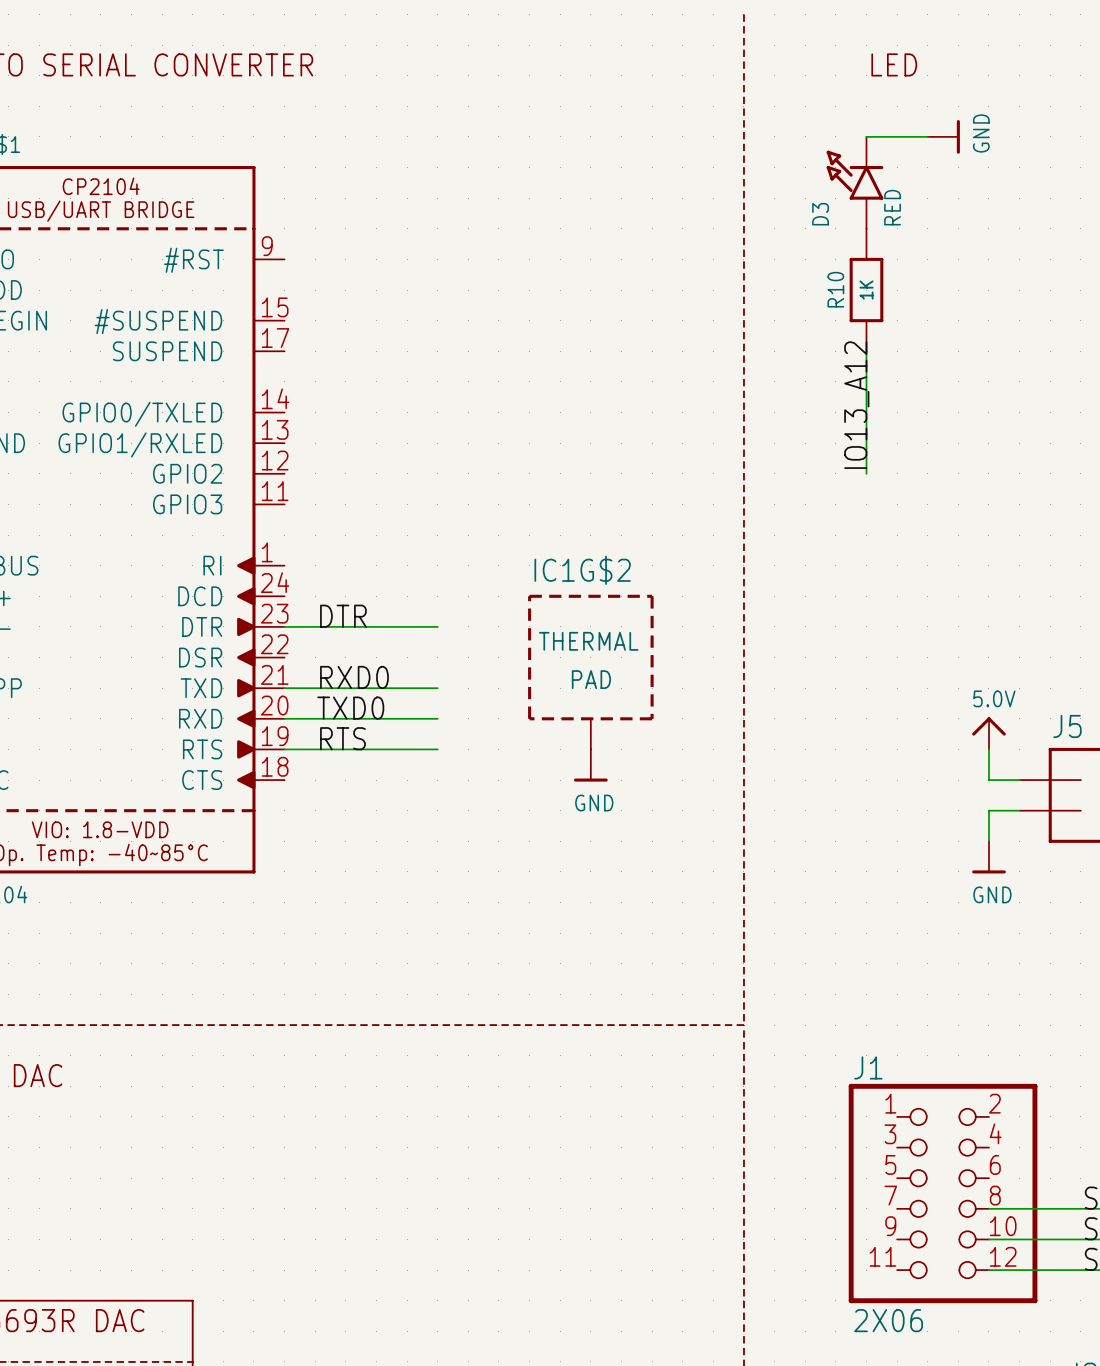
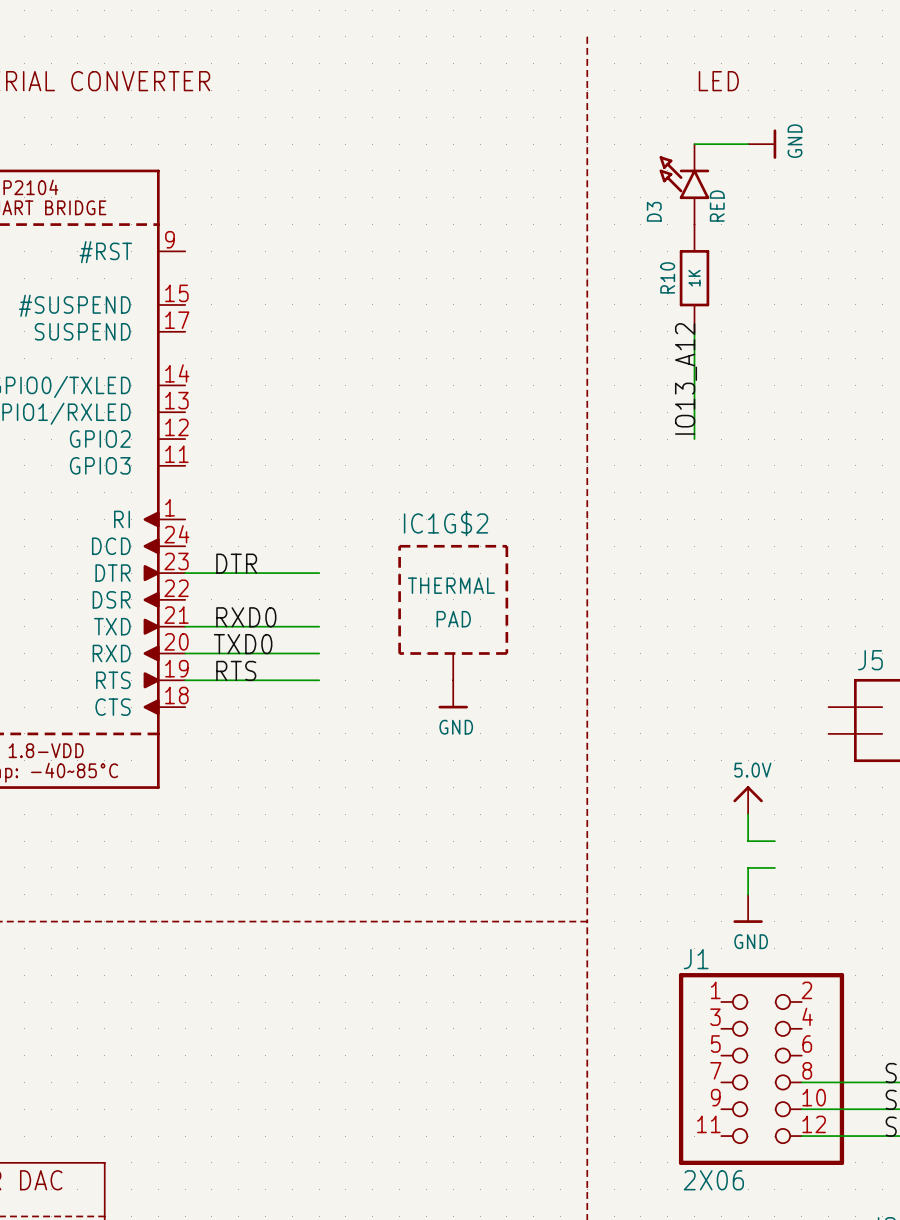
power symbol position: 5.0V (988, 733) -> 5.0V (748, 800)
wire: (988, 749) (988, 780) (1019, 780) -> (748, 814) (748, 841) (774, 841)
wire: (1019, 810) (988, 810) (988, 841) -> (774, 867) (748, 867) (748, 894)
power symbol position: GND (988, 857) -> GND (748, 908)

